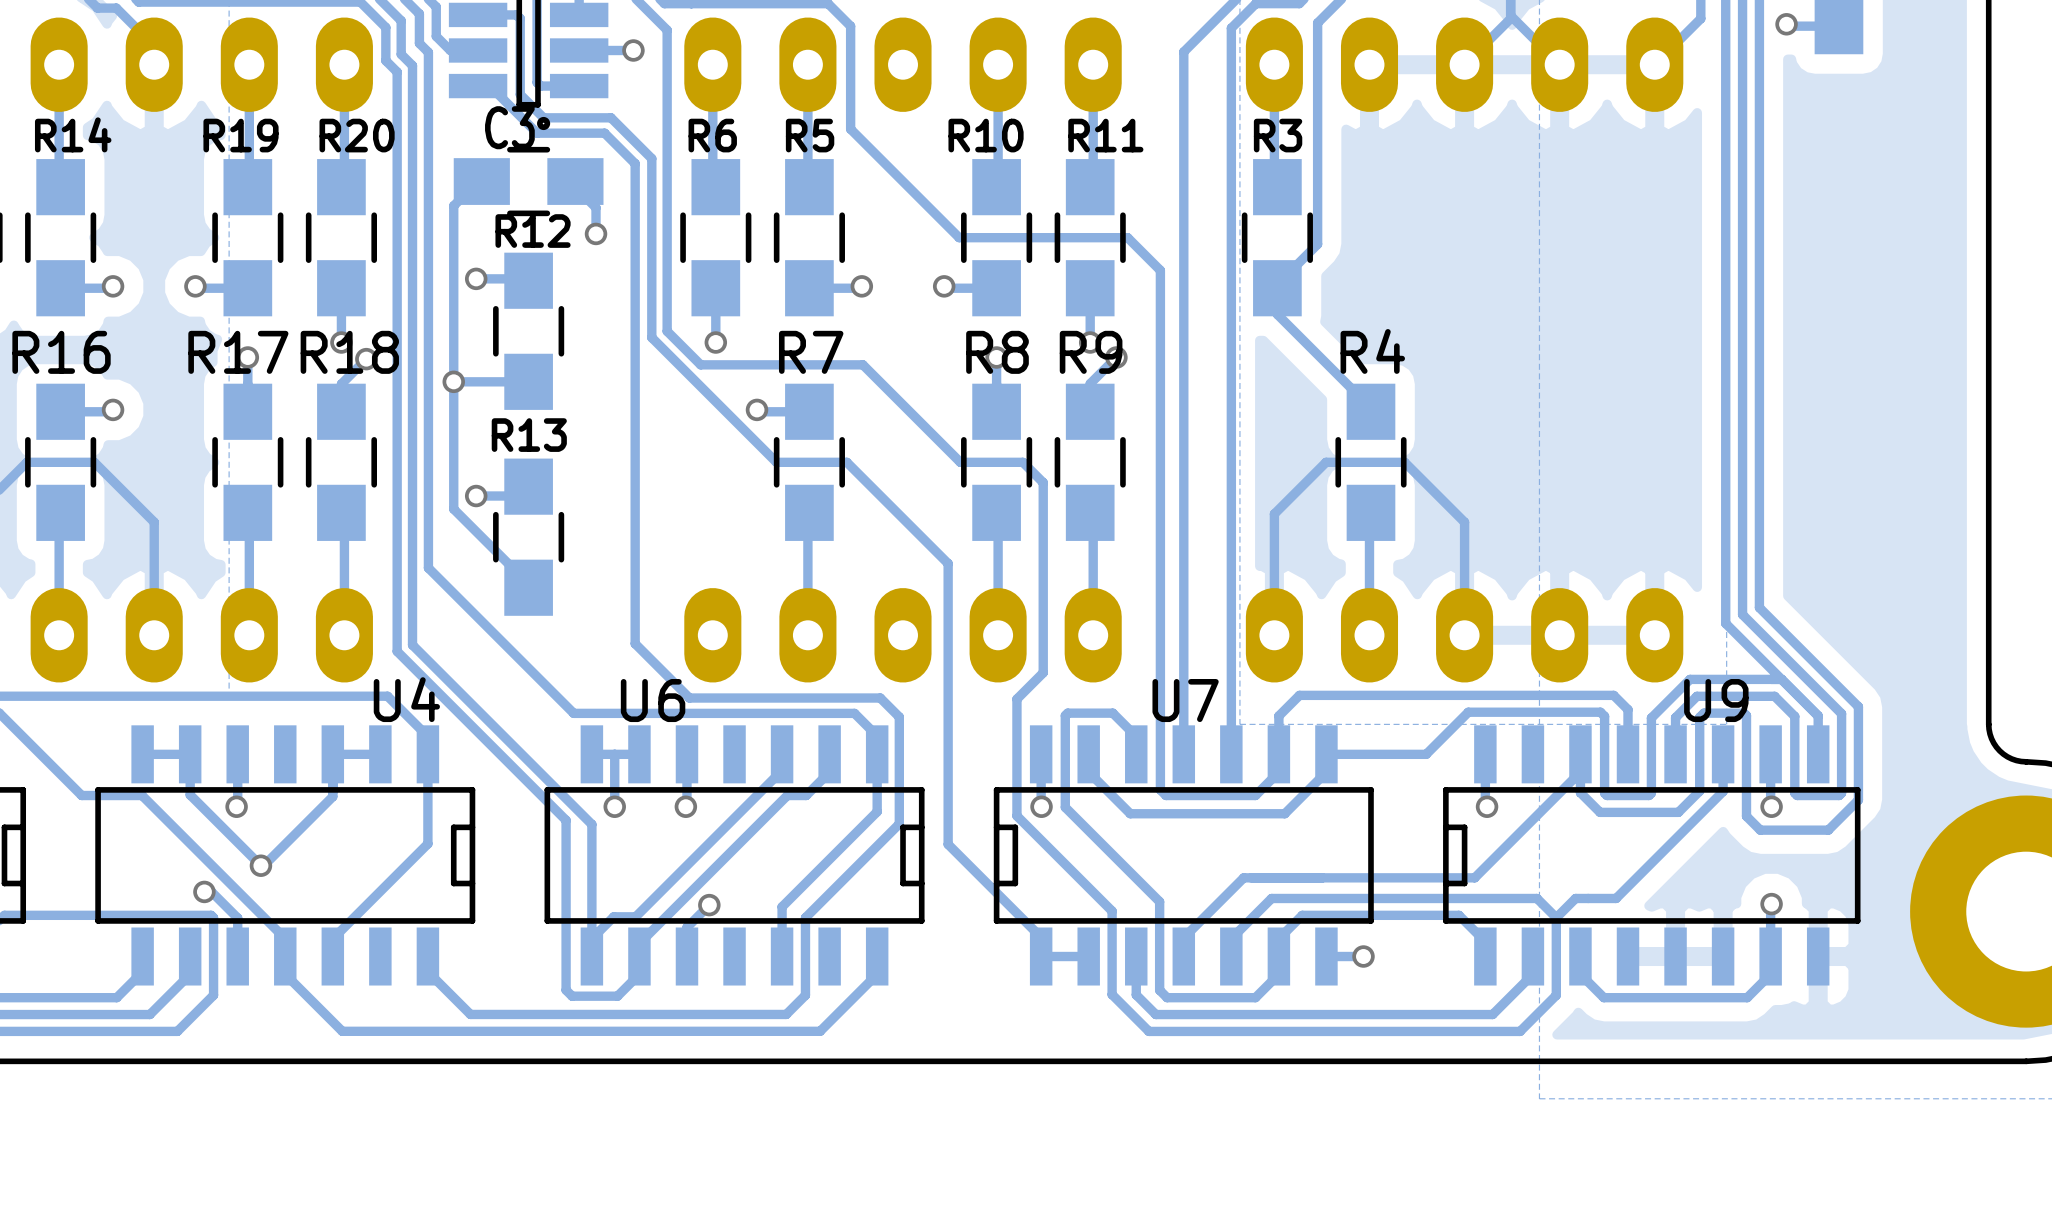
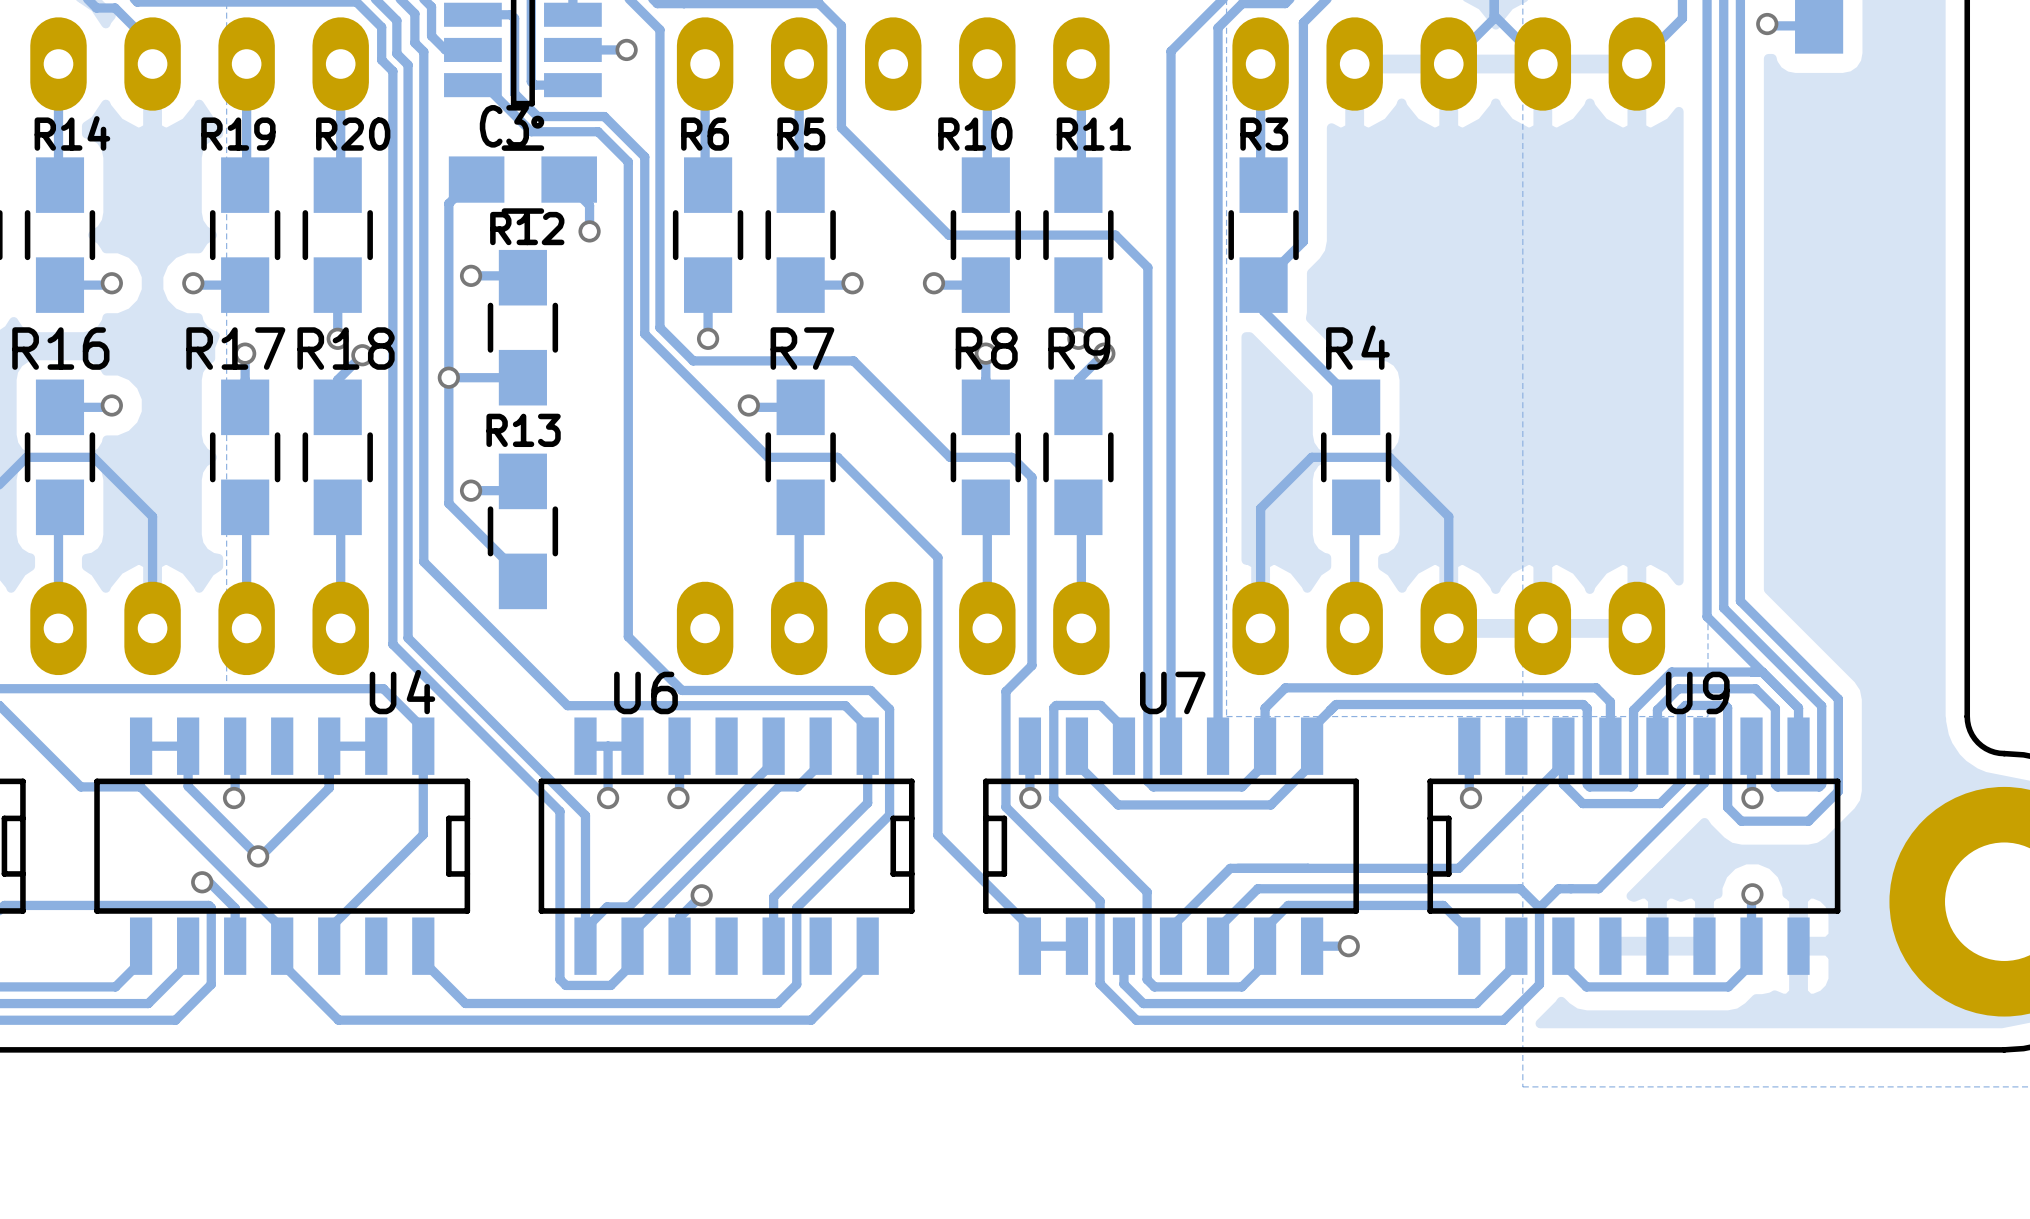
track: (1468, 712) (1426, 754) (1326, 754) -> (1452, 704) (1336, 704) (1312, 728) (1312, 746)

